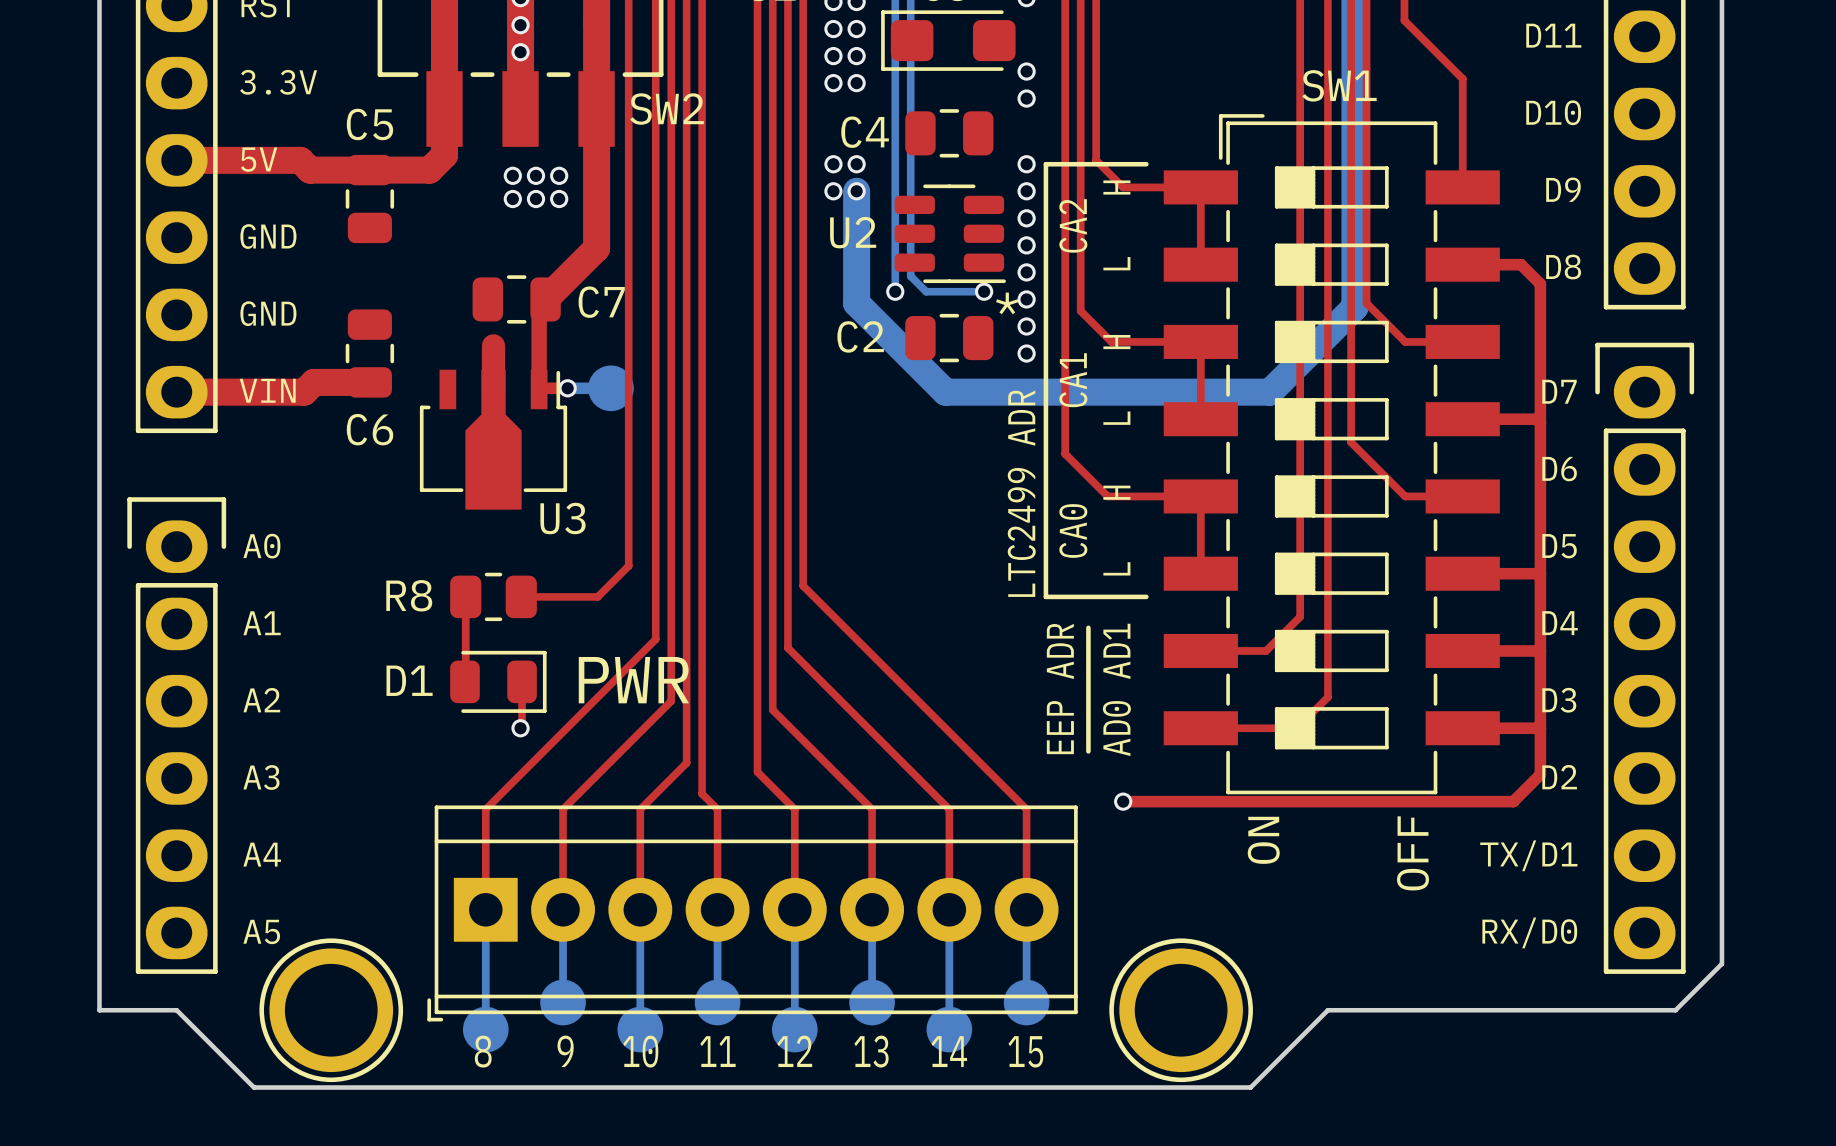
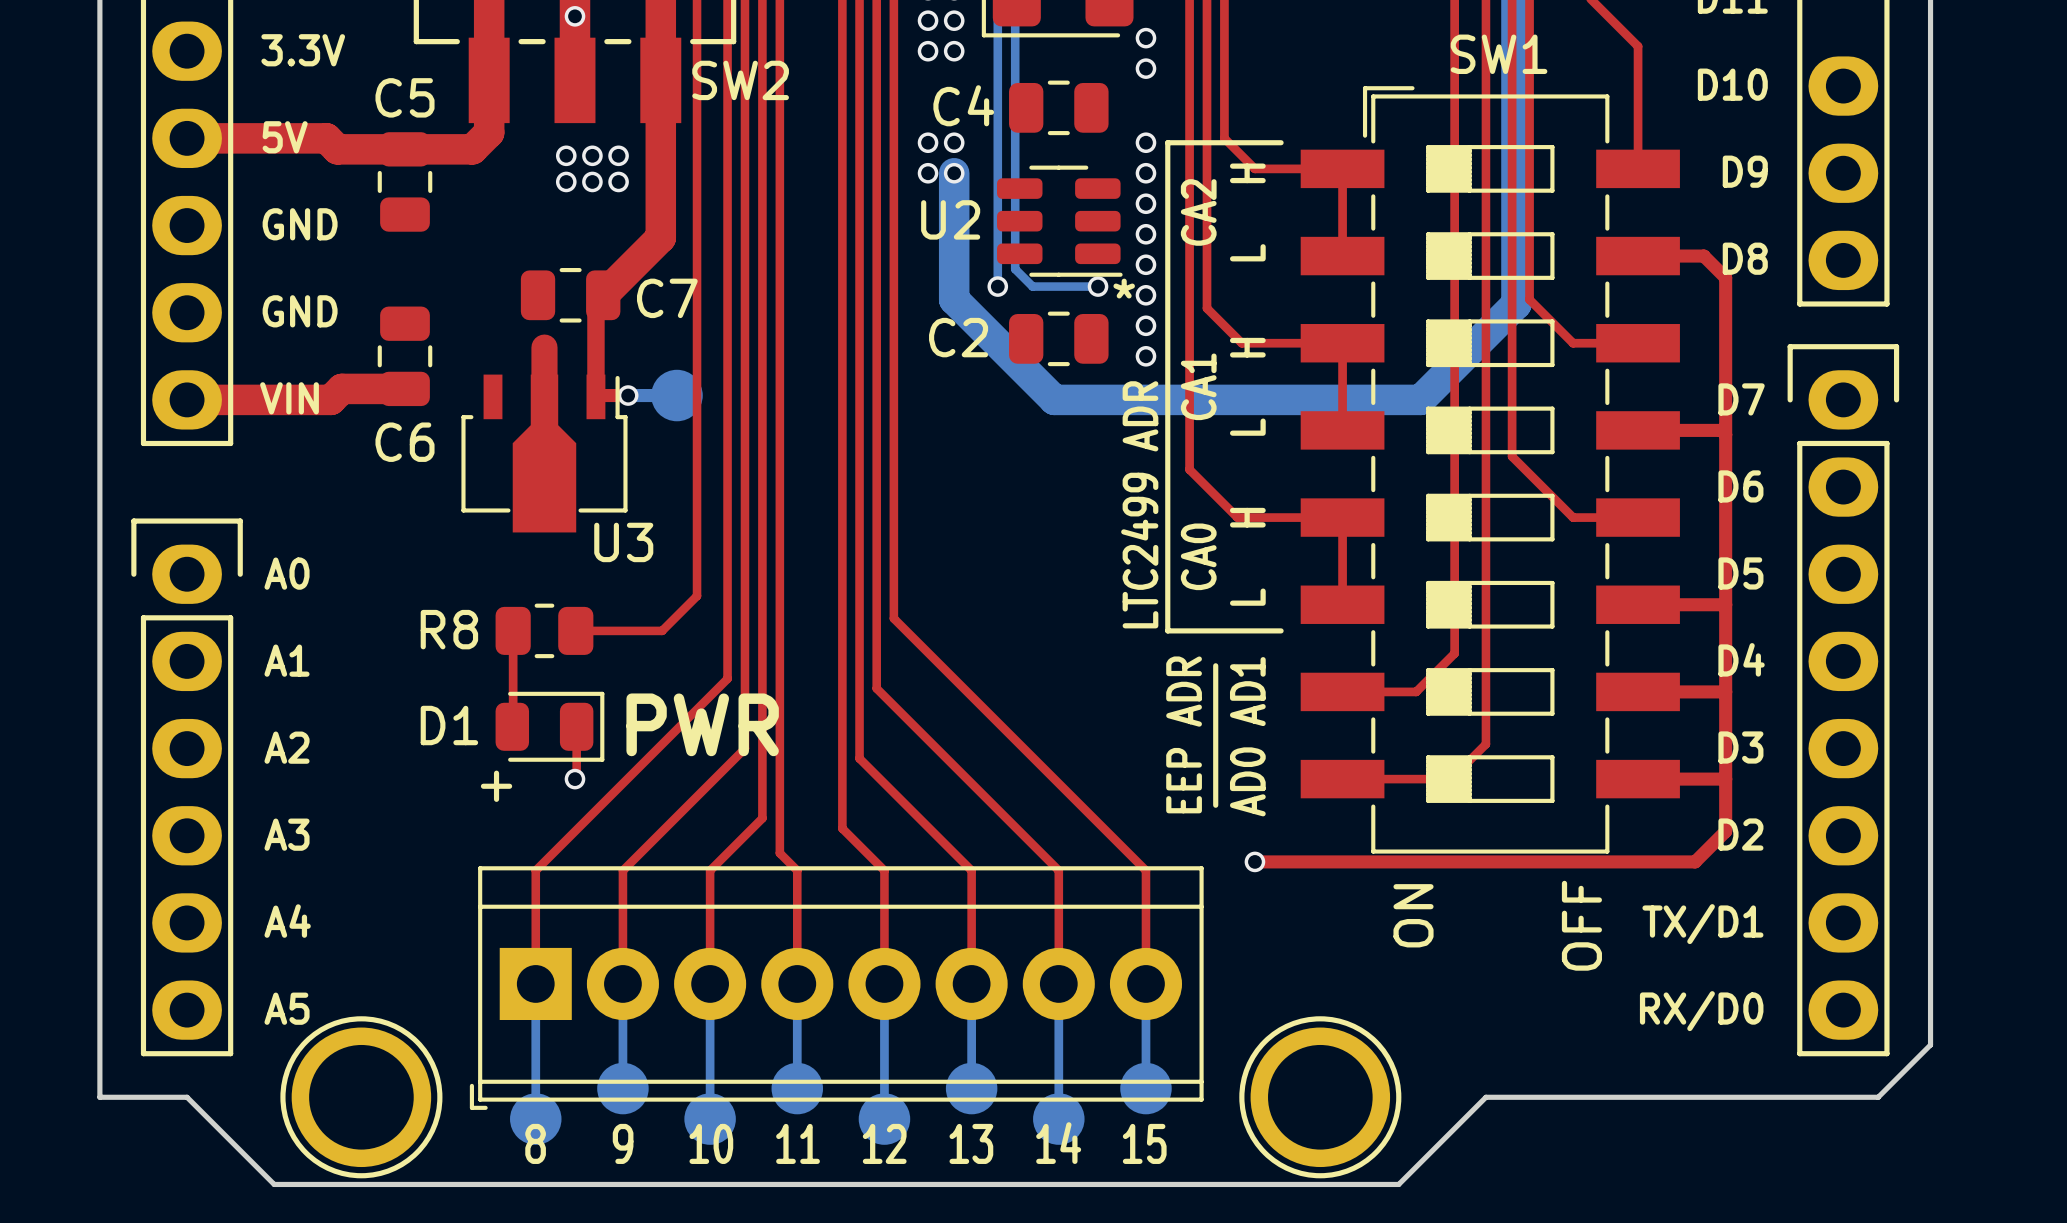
text: none -> + (496, 786)

